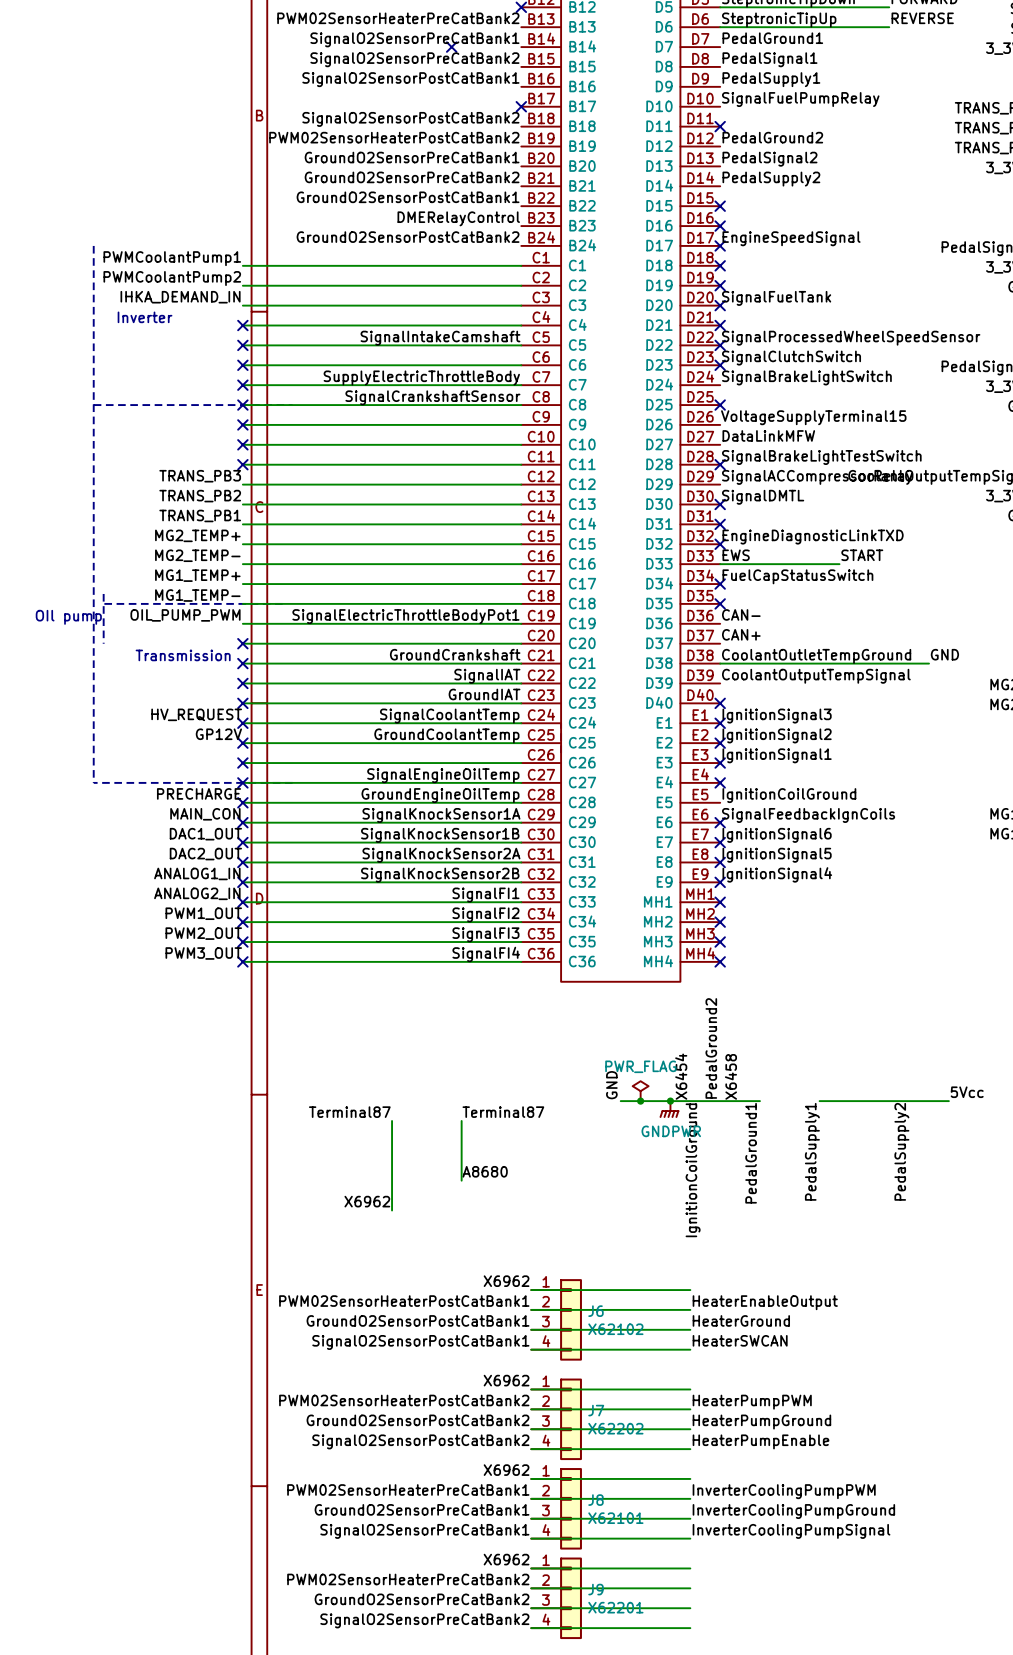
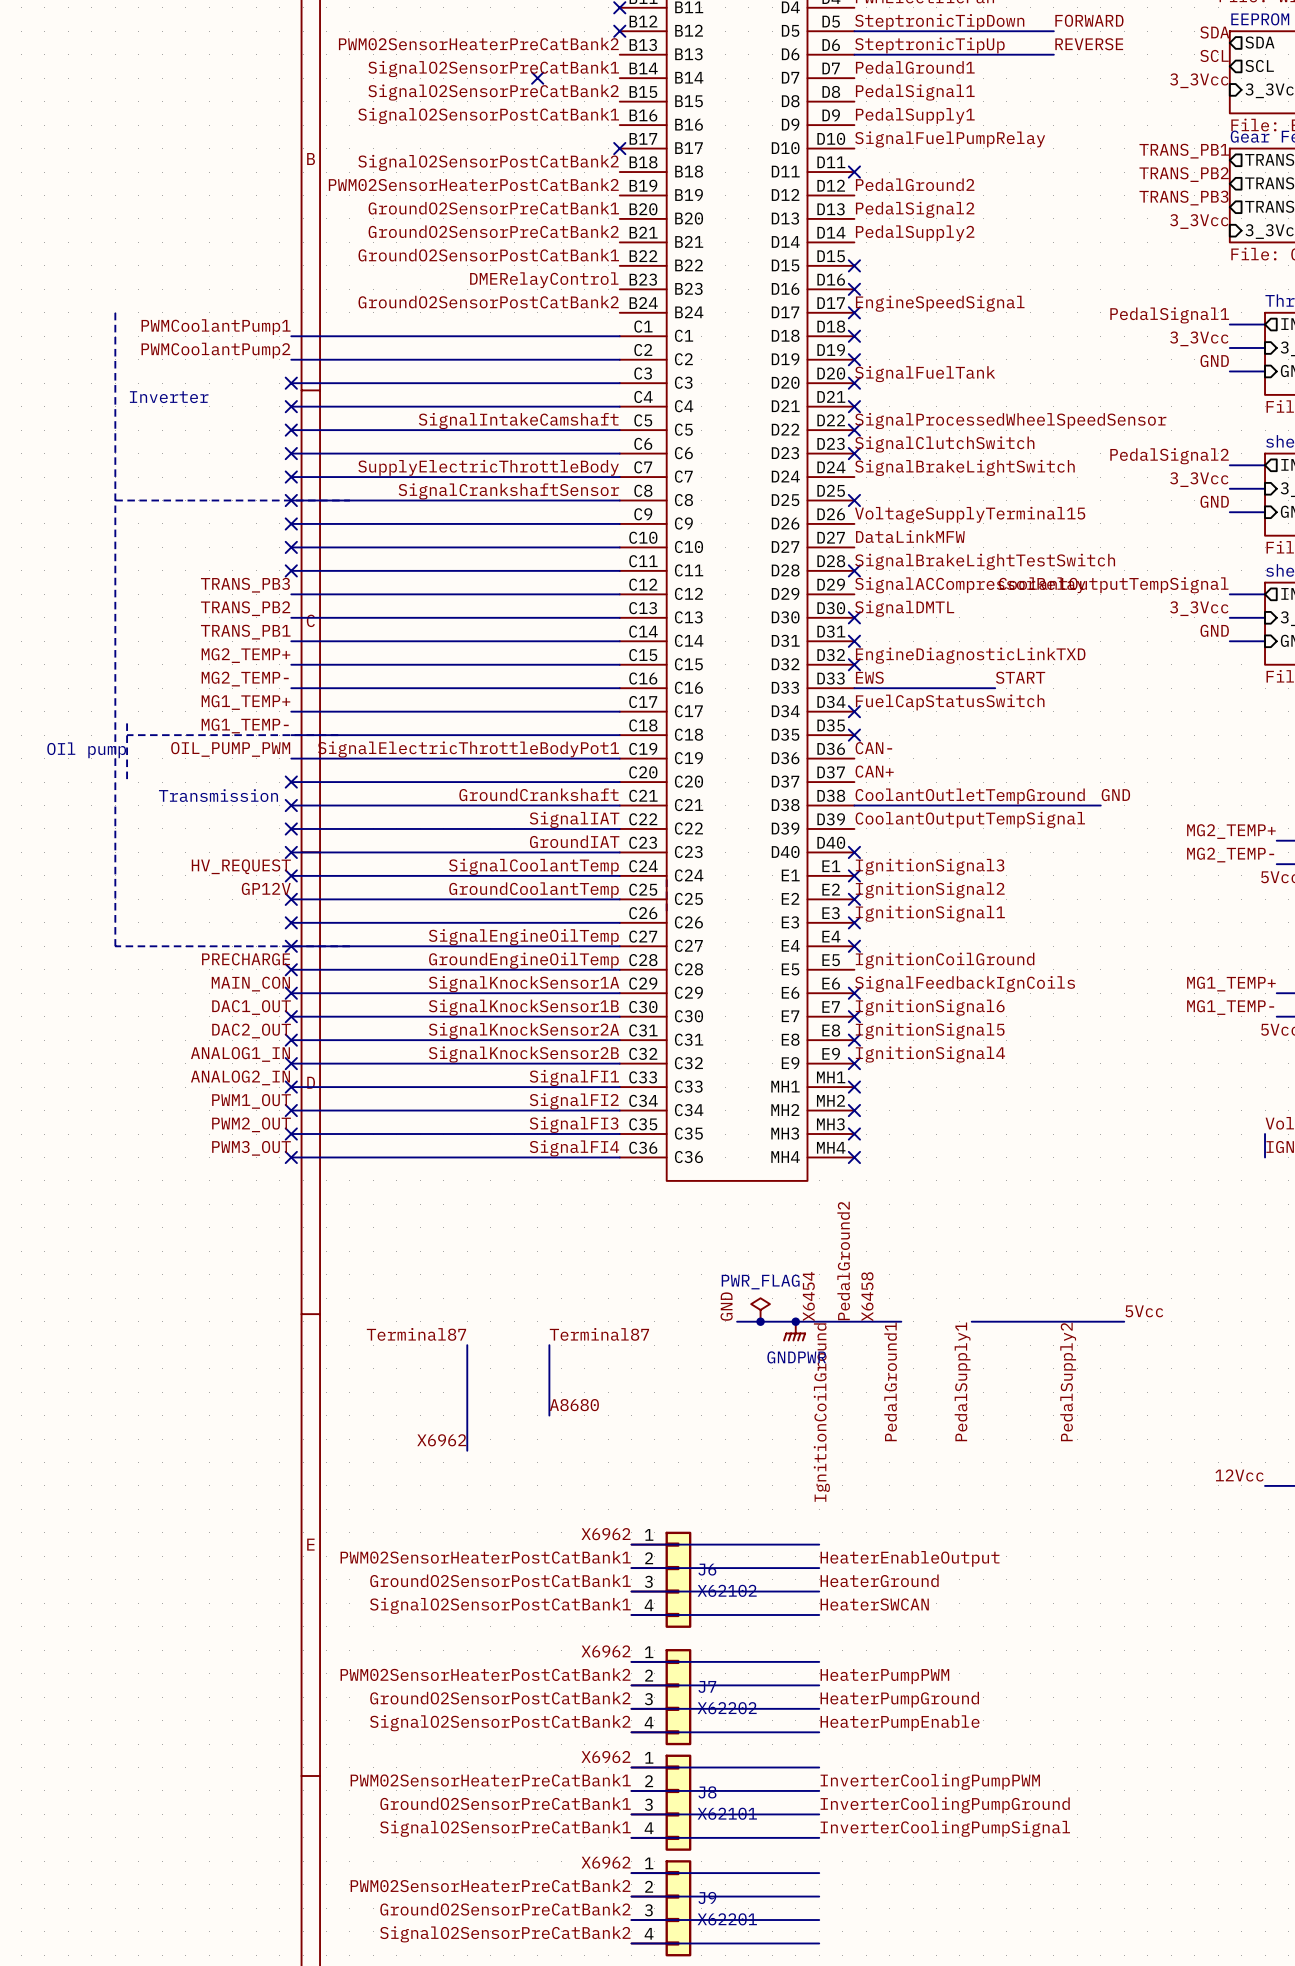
label: IHKA_DEMAND_IN (180, 297) -> none
no-connect mark: none -> (291, 383)

